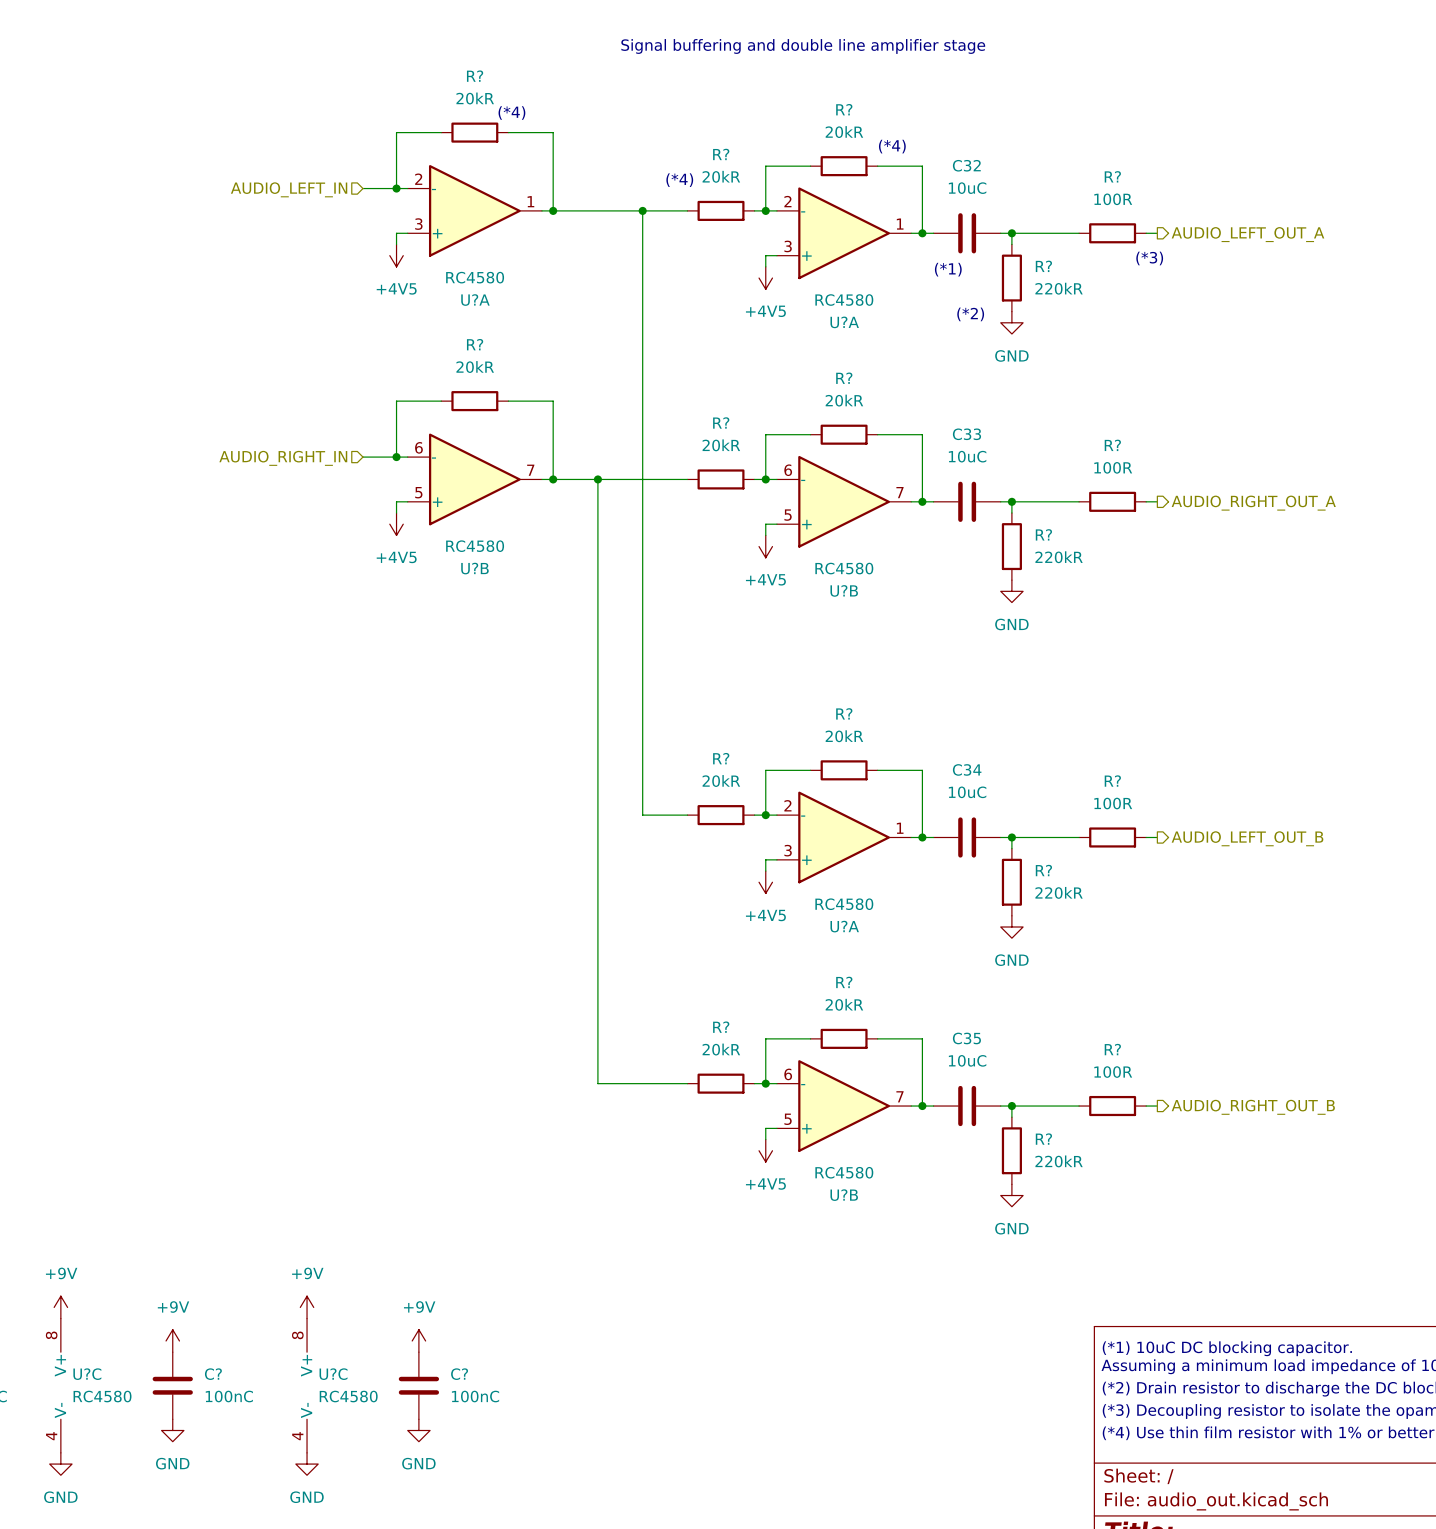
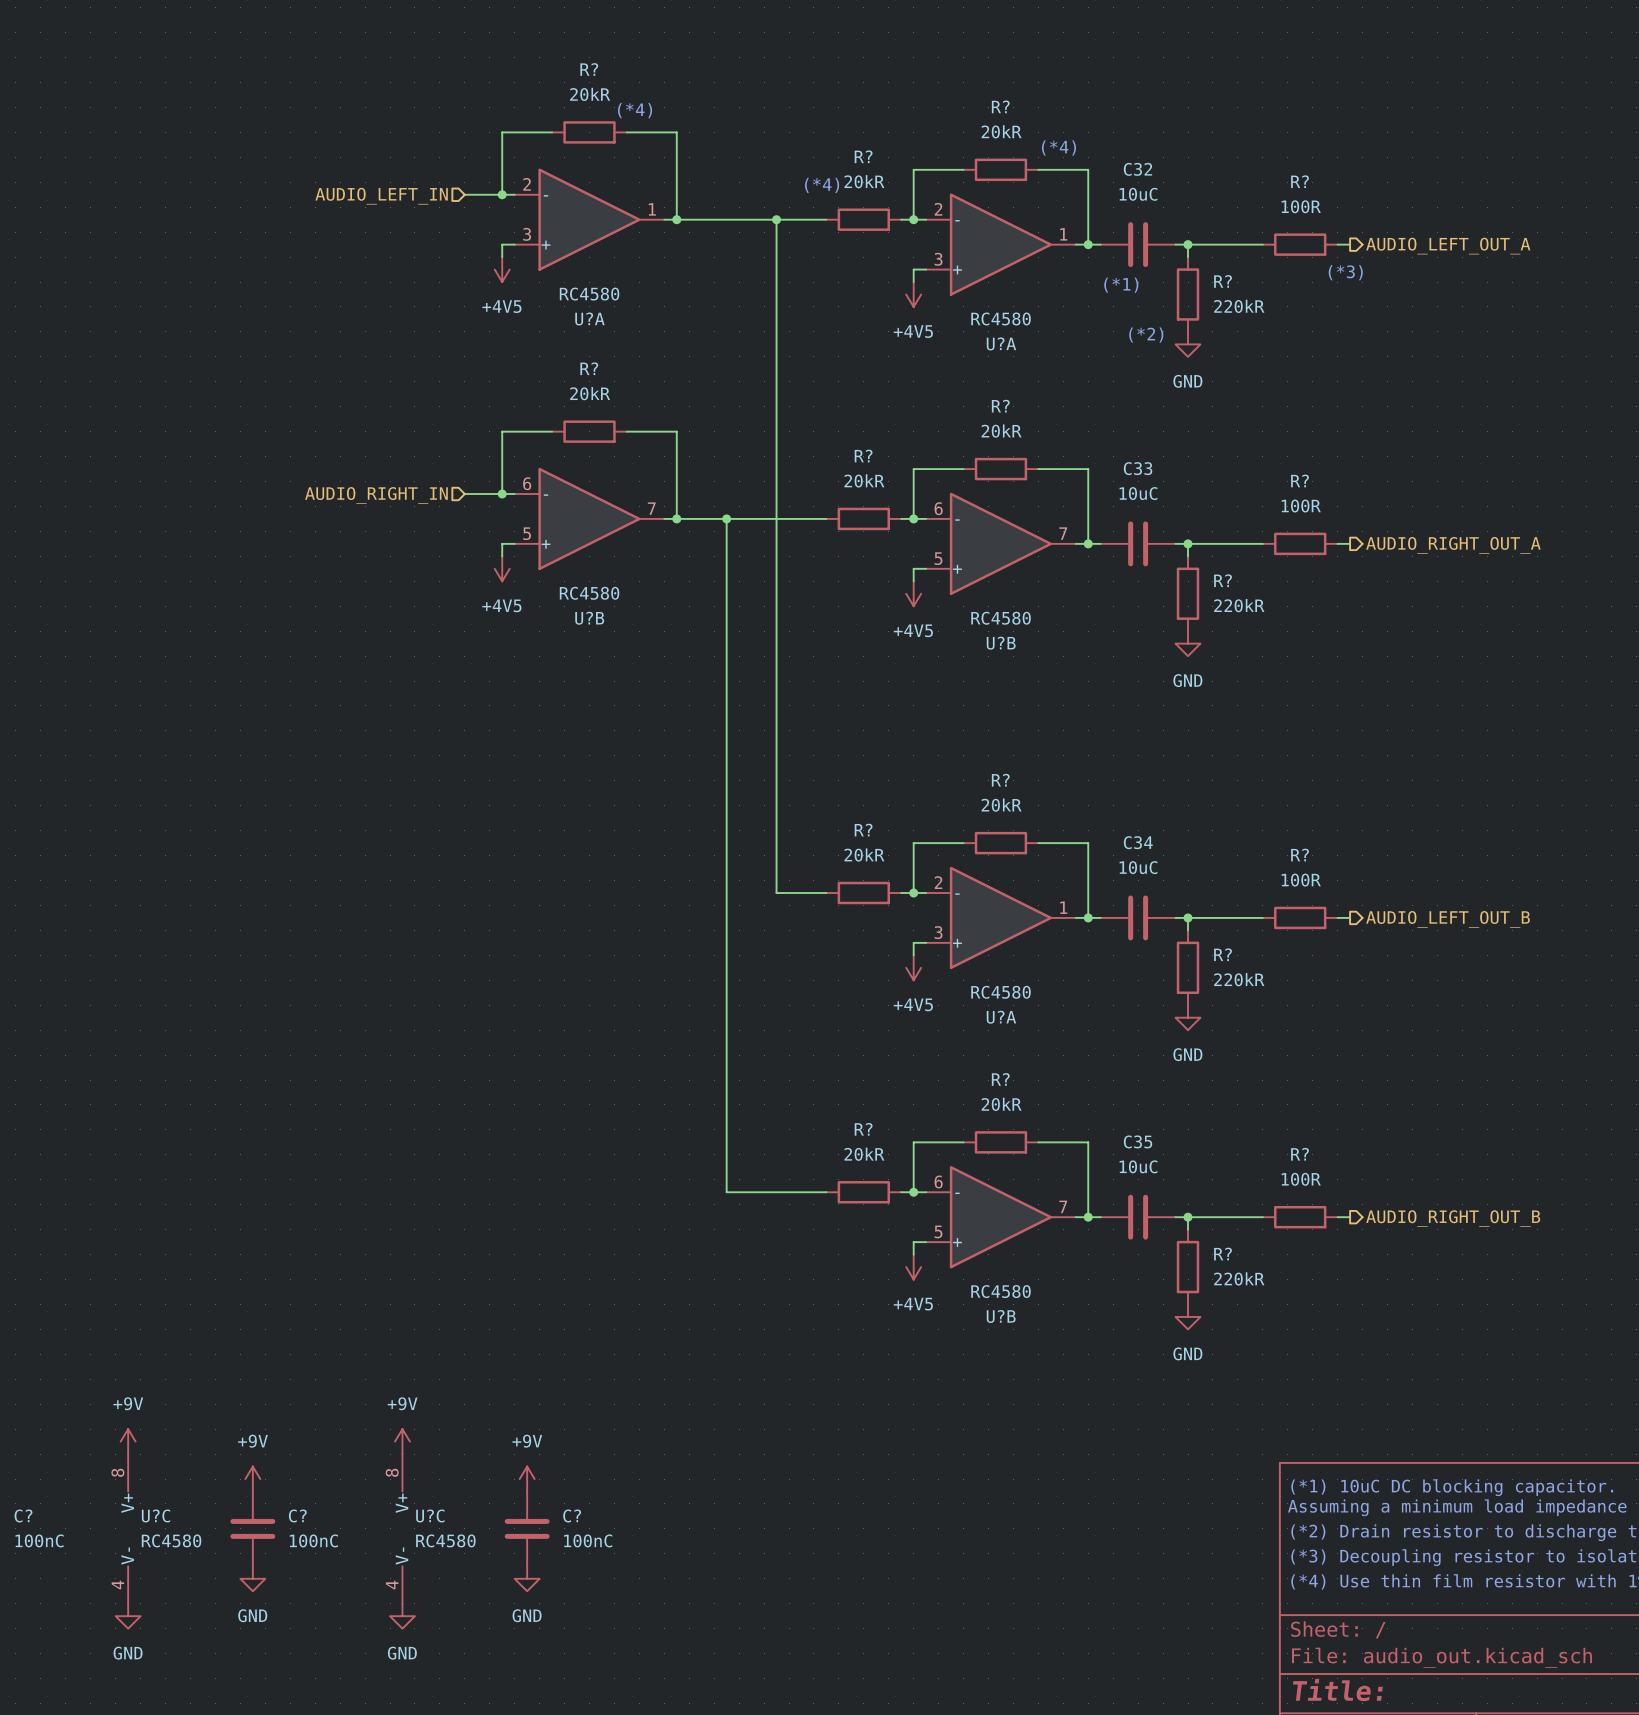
text: Signal buffering and double line amplifier stage (803, 46) -> none

